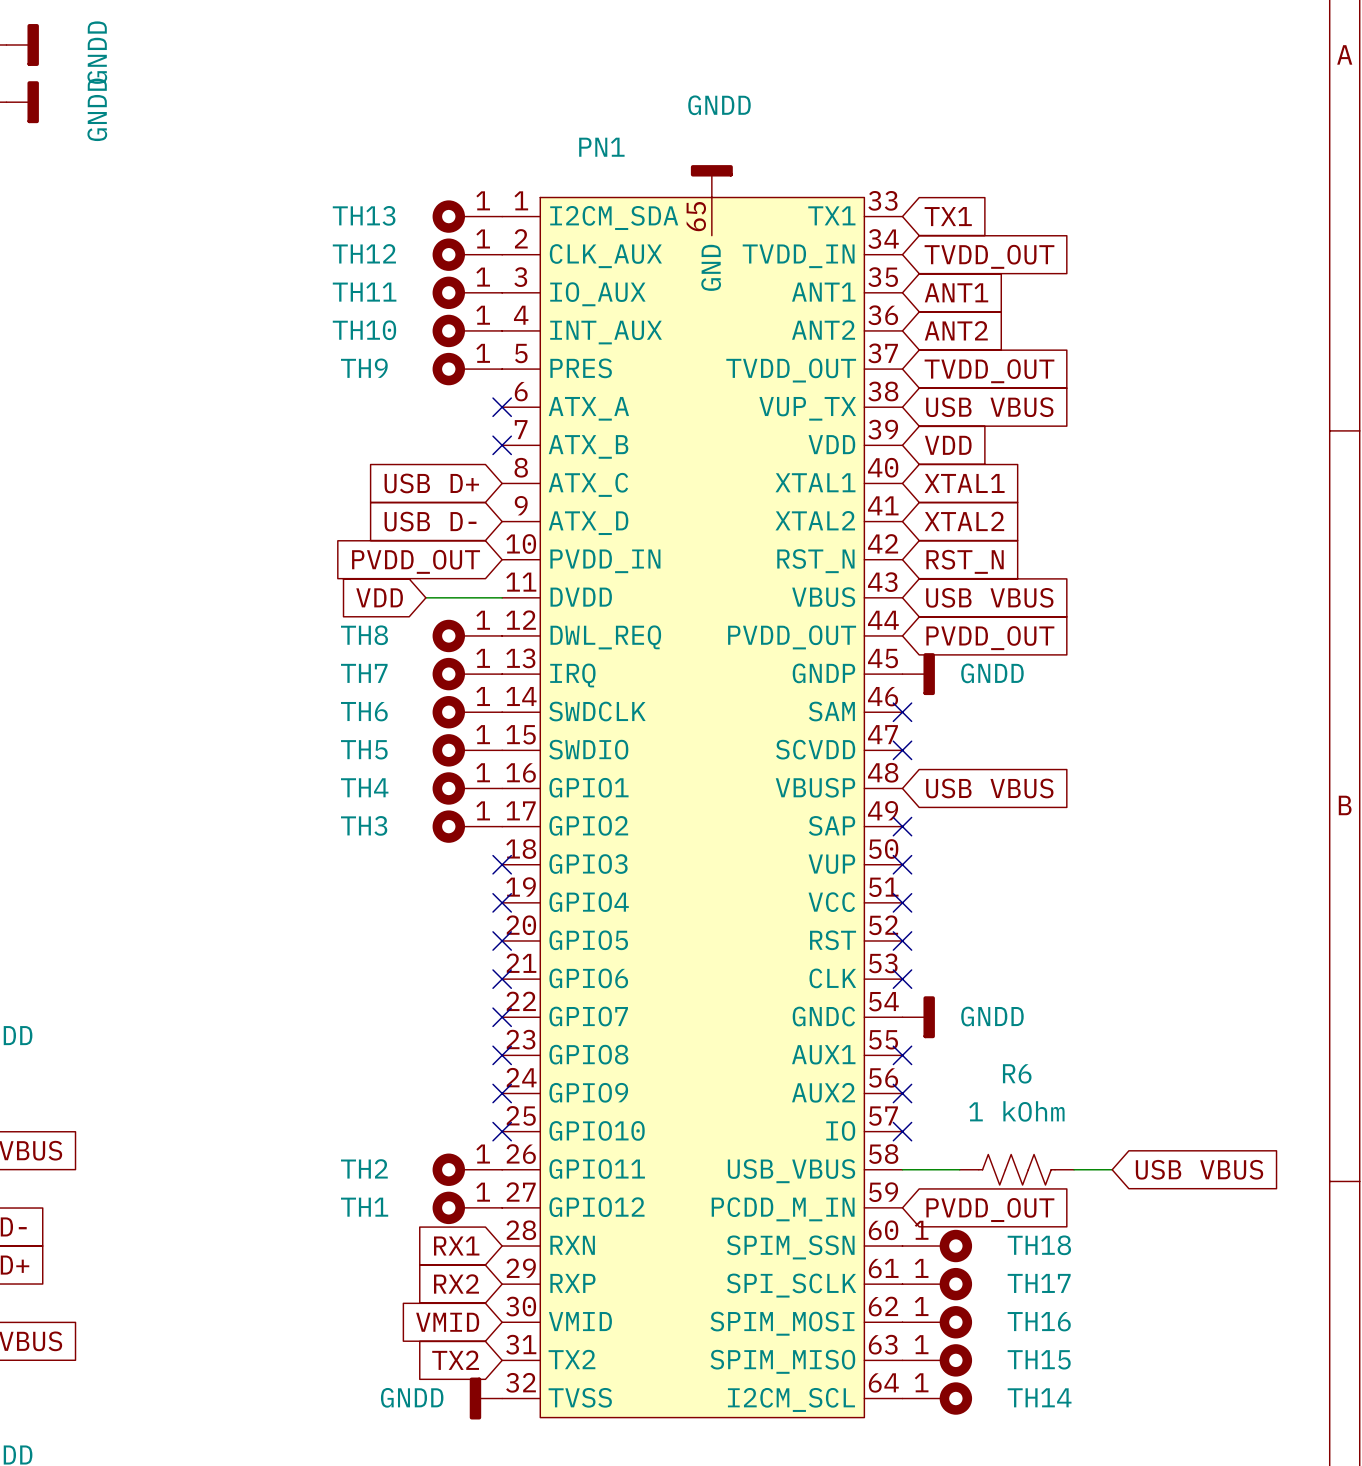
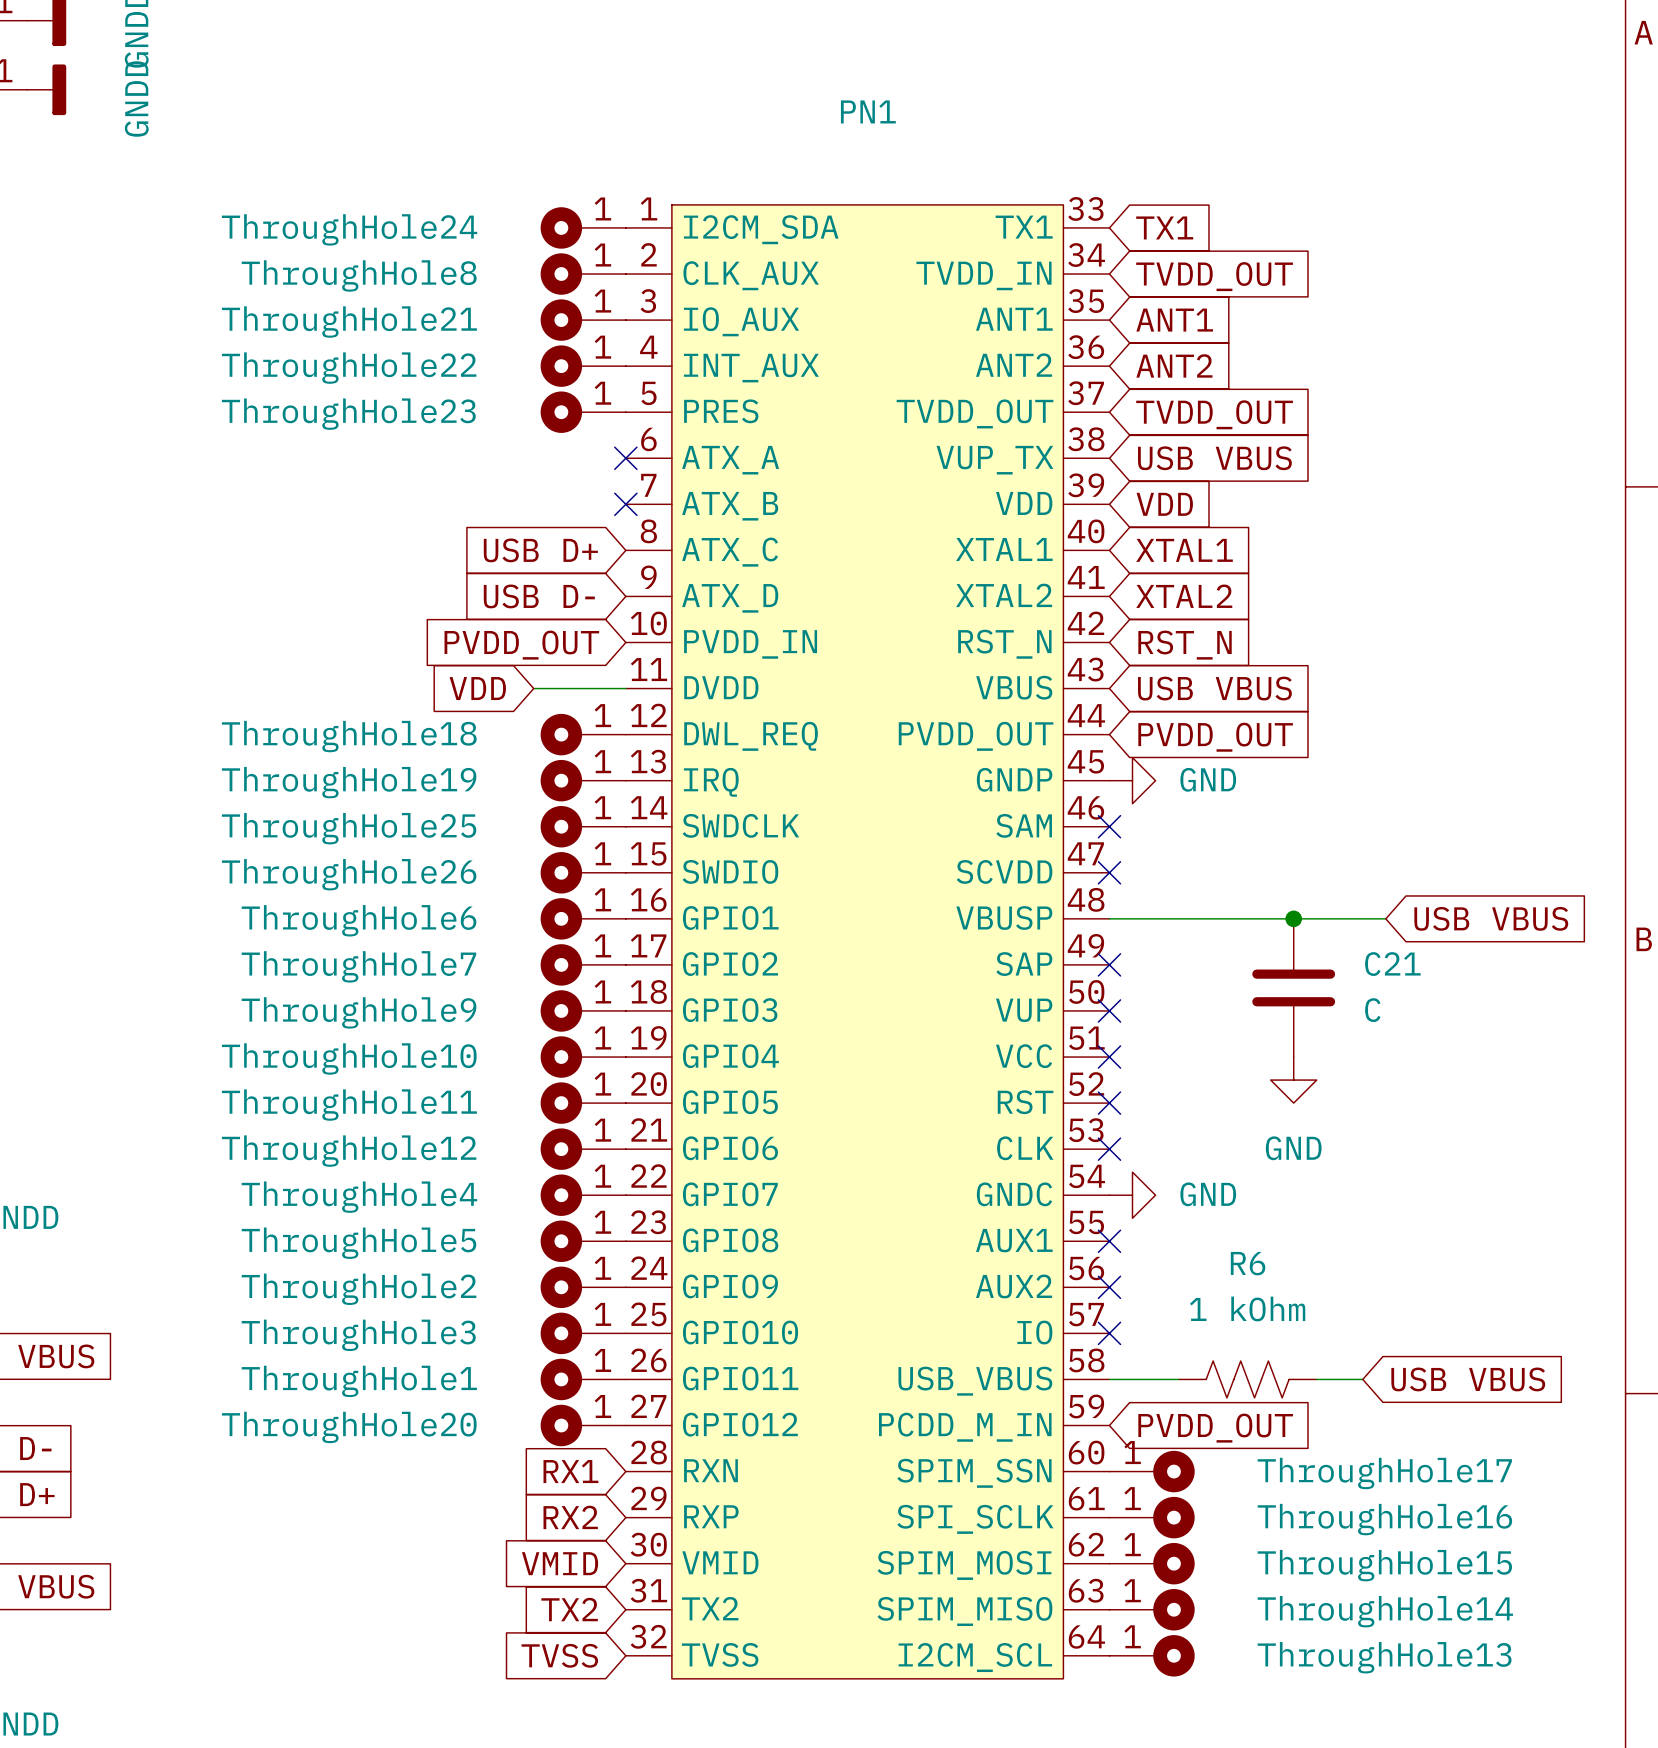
PN1 name position: PN1 (601, 147) -> PN1 (868, 111)
power symbol: GNDD (711, 181) -> none
PN1 symbol: [502, 197, 903, 1418] -> [625, 204, 1110, 1679]
ThroughHole24: none -> (583, 227)
TH13: (467, 216) -> none
ThroughHole8: none -> (583, 274)
TH12: (467, 254) -> none
ThroughHole21: none -> (583, 320)
TH11: (467, 292) -> none
ThroughHole22: none -> (583, 366)
TH10: (467, 330) -> none
ThroughHole23: none -> (583, 412)
TH9: (467, 369) -> none
ThroughHole18: none -> (583, 734)
TH8: (467, 635) -> none
ThroughHole19: none -> (583, 780)
TH7: (467, 674) -> none
power symbol: GNDD (918, 674) -> GND (1132, 780)
ThroughHole25: none -> (583, 826)
TH6: (467, 712) -> none
ThroughHole26: none -> (583, 872)
TH5: (467, 750) -> none
ThroughHole6: none -> (583, 918)
TH4: (467, 788) -> none
wire: none -> (1109, 918) (1385, 918)
global label position: USB VBUS (989, 788) -> USB VBUS (1491, 918)
junction: none -> (1293, 918)
ThroughHole7: none -> (583, 964)
TH3: (467, 826) -> none
C21: none -> C (1293, 987)
ThroughHole9: none -> (583, 1010)
no-connect mark: (502, 864) -> none
ThroughHole10: none -> (583, 1057)
no-connect mark: (502, 902) -> none
power symbol: none -> GND (1293, 1080)
ThroughHole11: none -> (583, 1103)
no-connect mark: (502, 940) -> none
ThroughHole12: none -> (583, 1149)
no-connect mark: (502, 979) -> none
ThroughHole4: none -> (583, 1195)
no-connect mark: (502, 1017) -> none
power symbol: GNDD (918, 1017) -> GND (1132, 1195)
ThroughHole5: none -> (583, 1241)
no-connect mark: (502, 1055) -> none
ThroughHole2: none -> (583, 1287)
no-connect mark: (502, 1093) -> none
ThroughHole3: none -> (583, 1333)
no-connect mark: (502, 1131) -> none
ThroughHole1: none -> (583, 1379)
TH2: (467, 1169) -> none
ThroughHole20: none -> (583, 1425)
TH1: (467, 1207) -> none
TH18: (937, 1246) -> none
ThroughHole17: none -> (1152, 1471)
TH17: (937, 1284) -> none
ThroughHole16: none -> (1152, 1517)
TH16: (937, 1322) -> none
ThroughHole15: none -> (1152, 1563)
TH15: (937, 1360) -> none
ThroughHole14: none -> (1152, 1609)
global label: none -> TVSS (559, 1655)
power symbol: GNDD (485, 1398) -> none
TH14: (937, 1398) -> none
ThroughHole13: none -> (1152, 1655)

